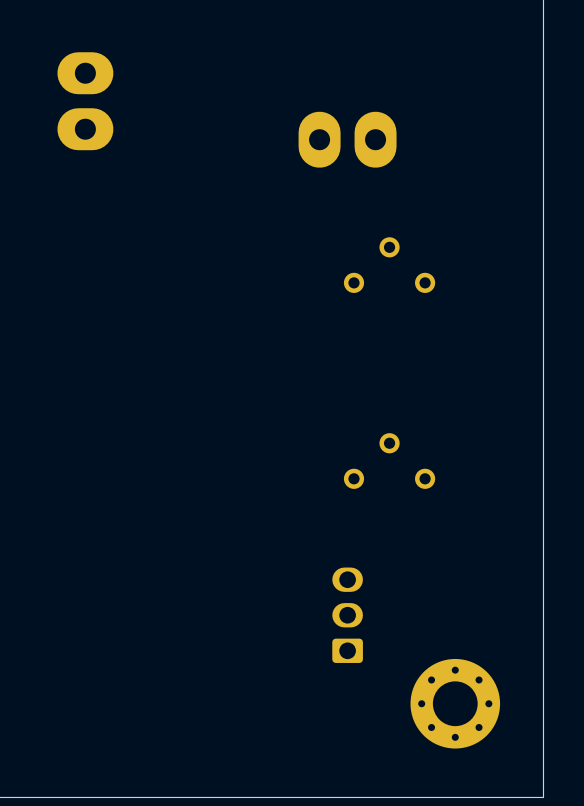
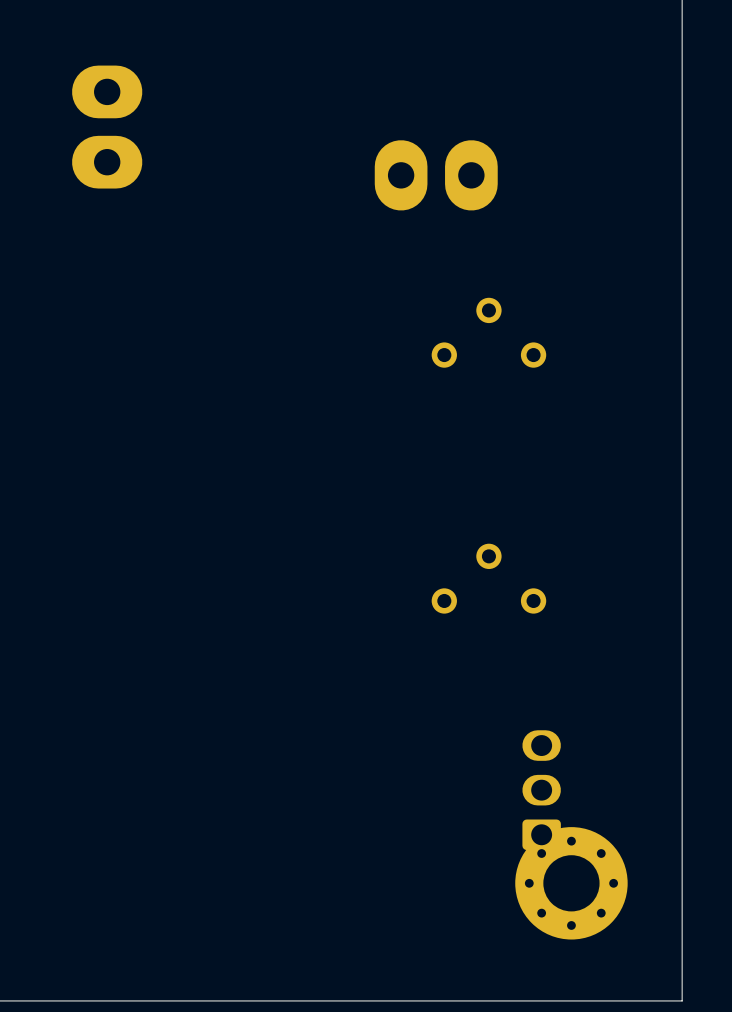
part position: (347, 615) -> (541, 790)

